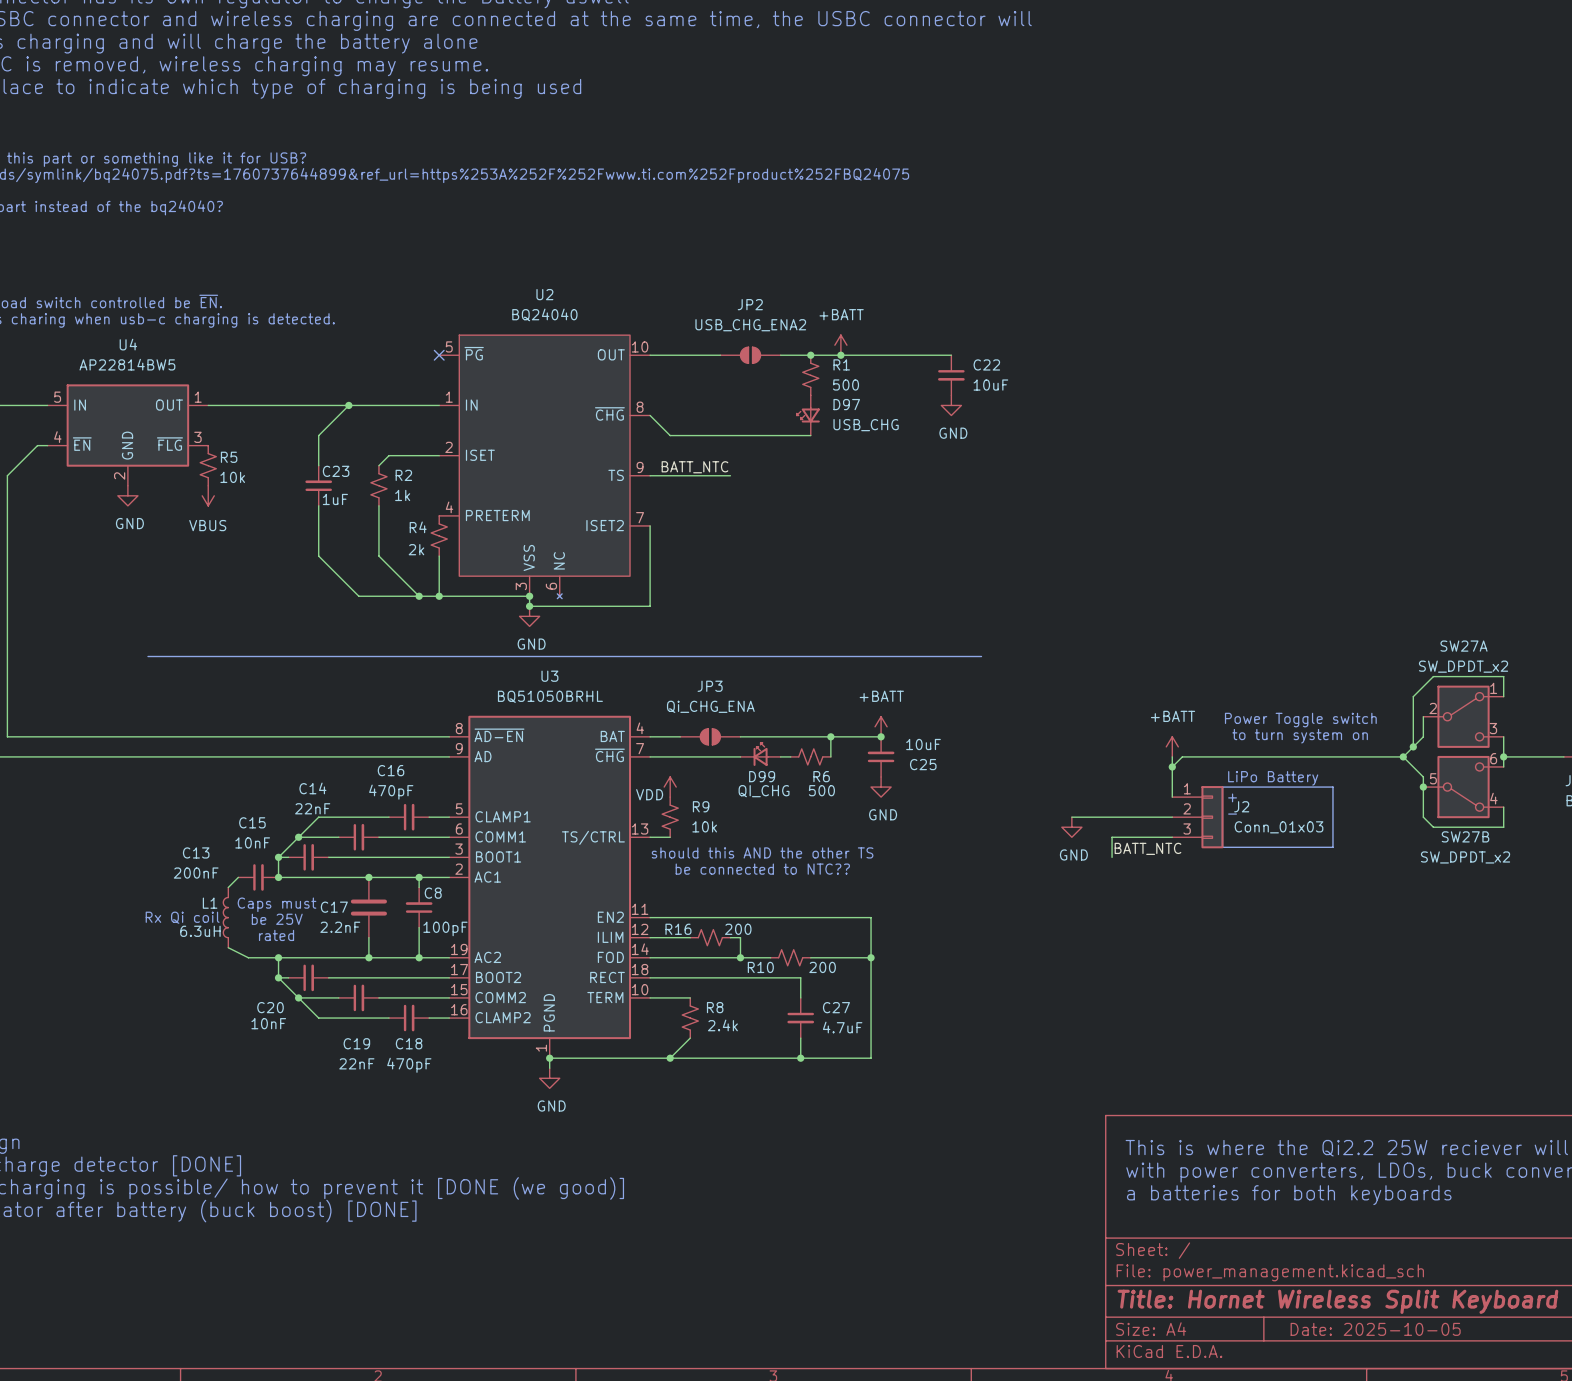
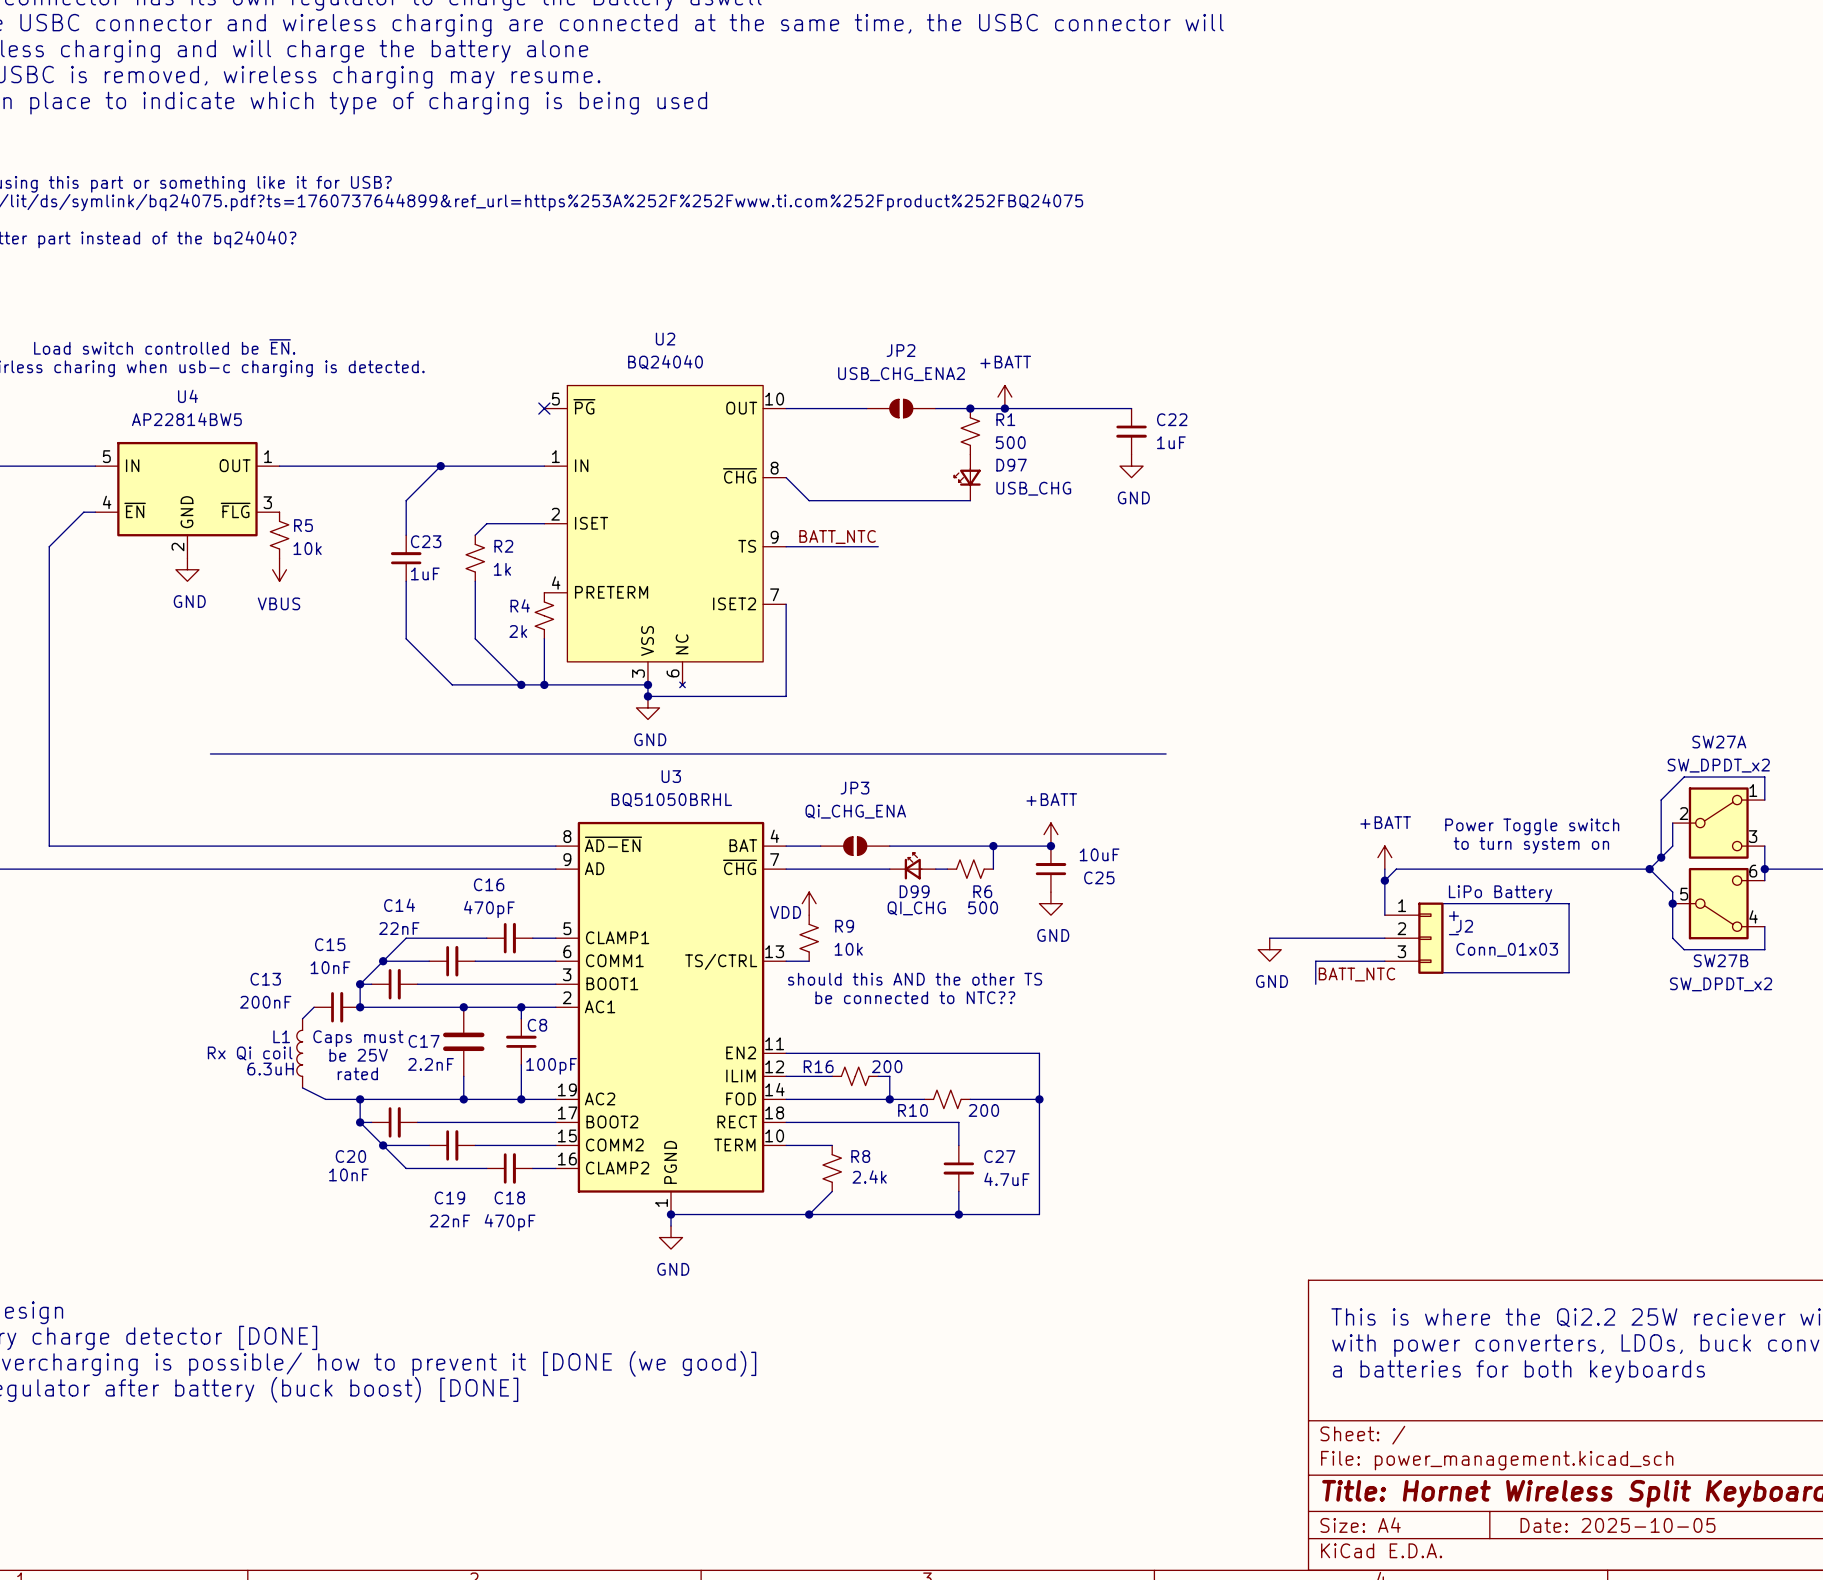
C22 value: 10uF (990, 385) -> 1uF (1171, 442)

